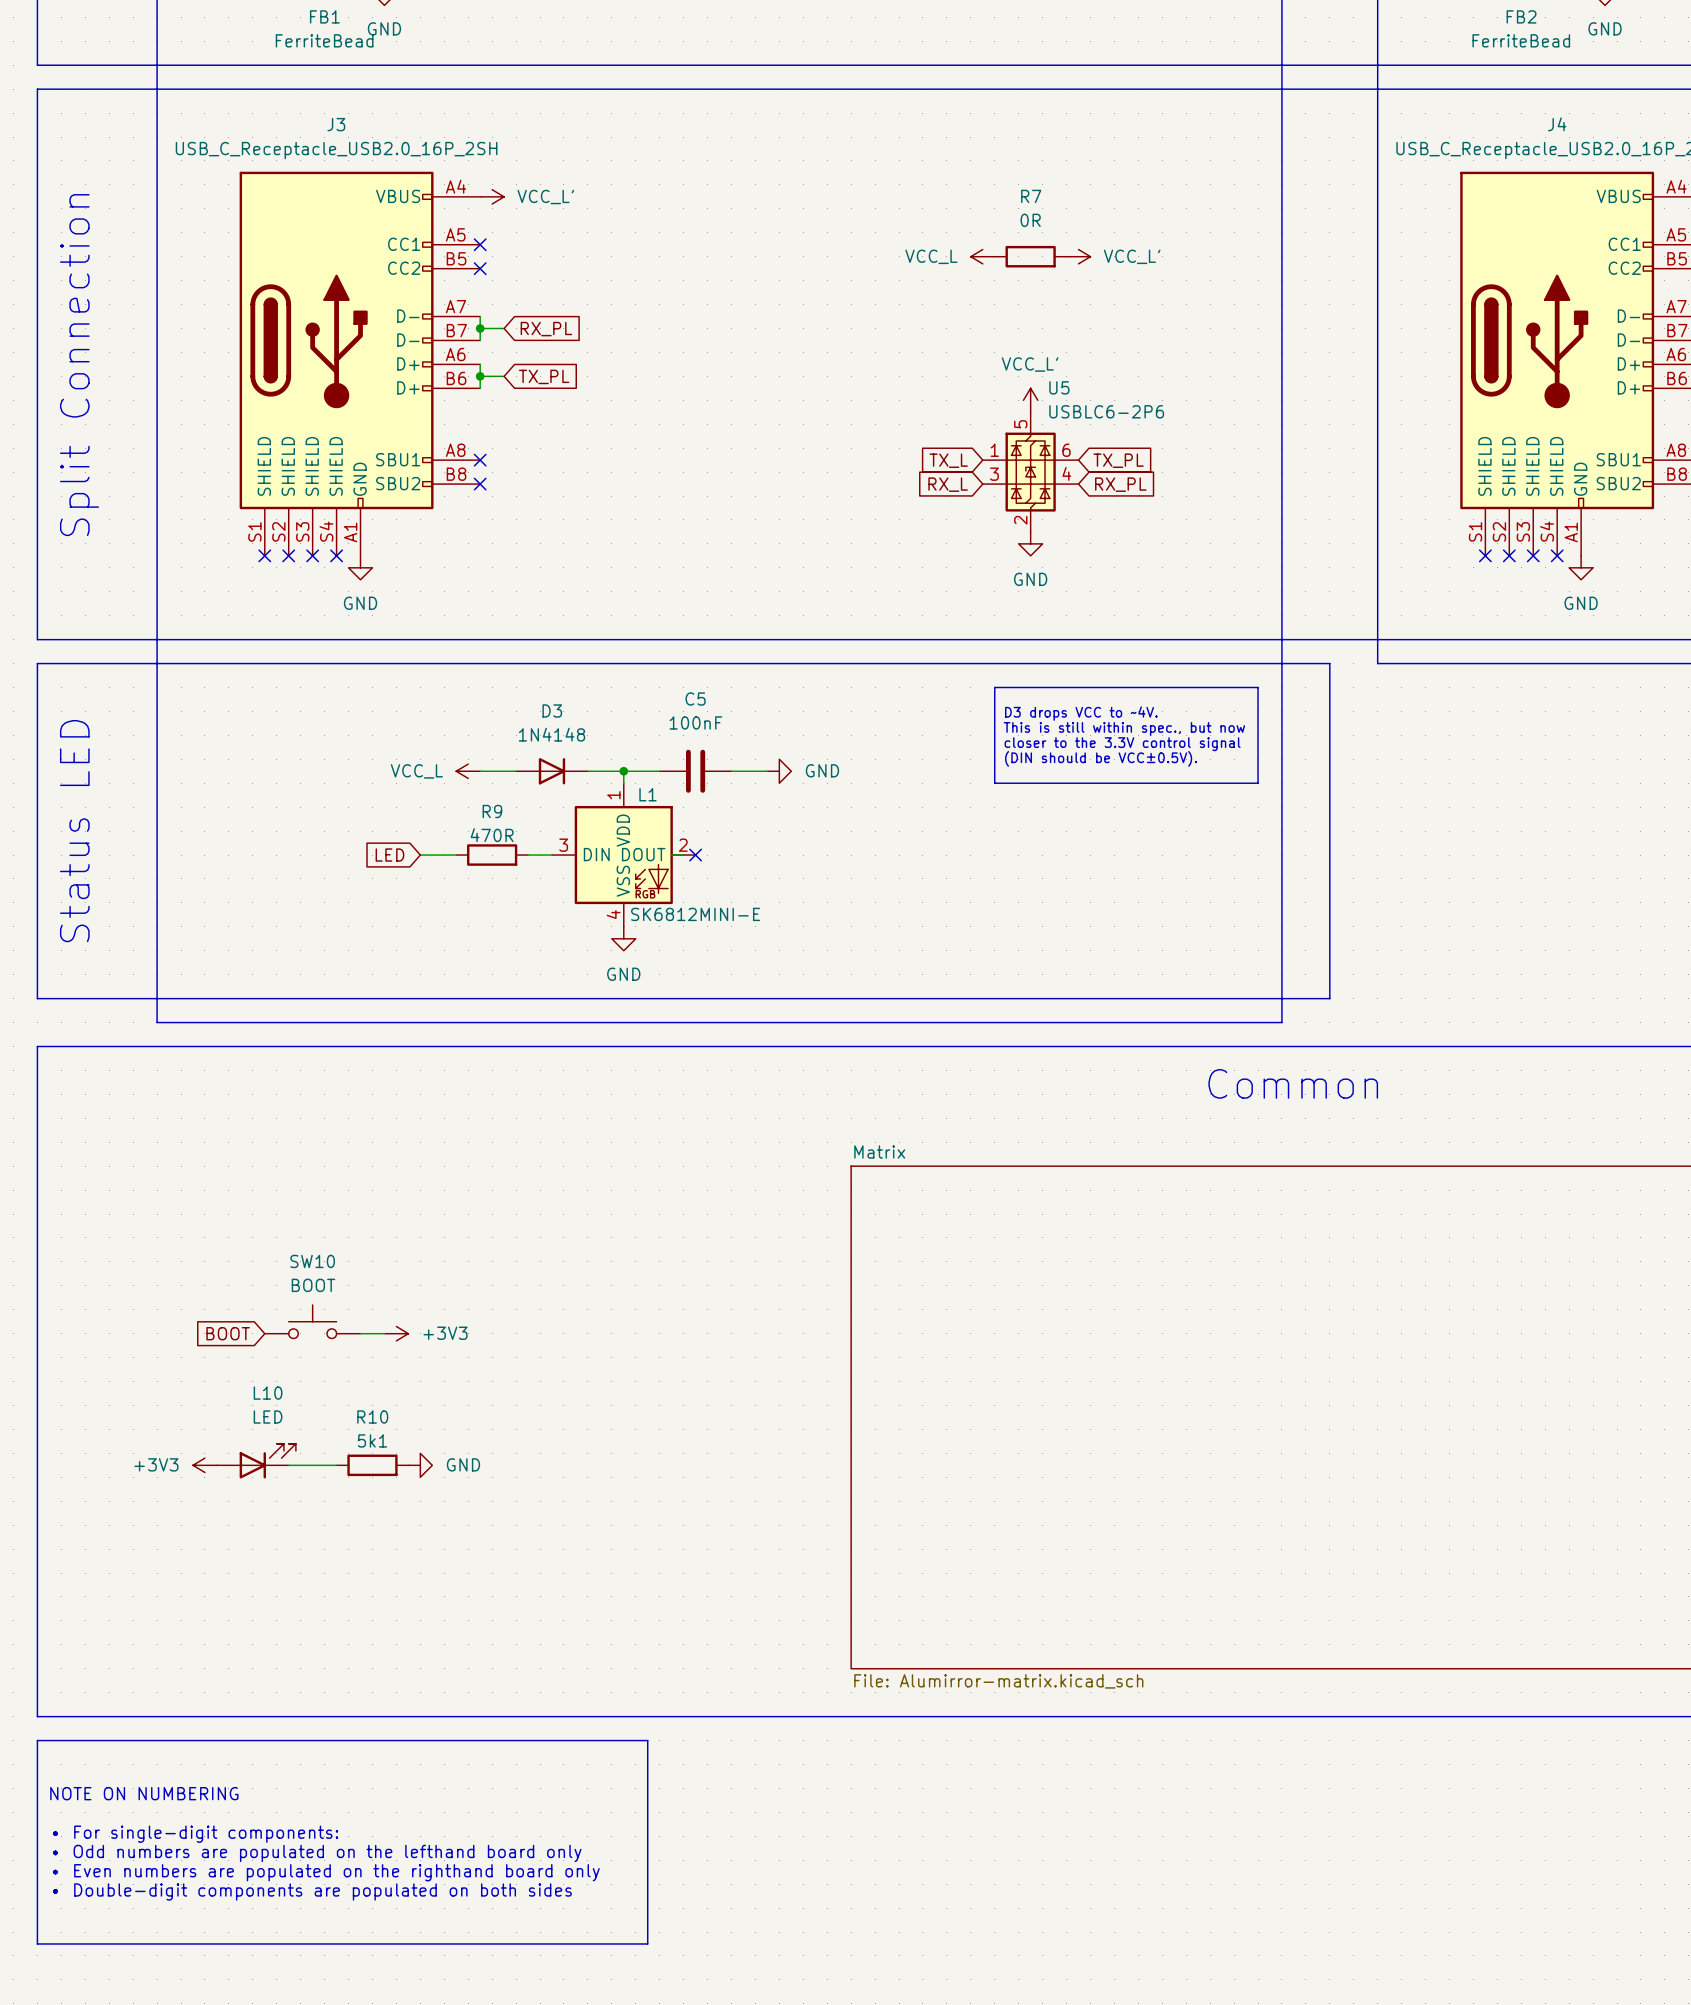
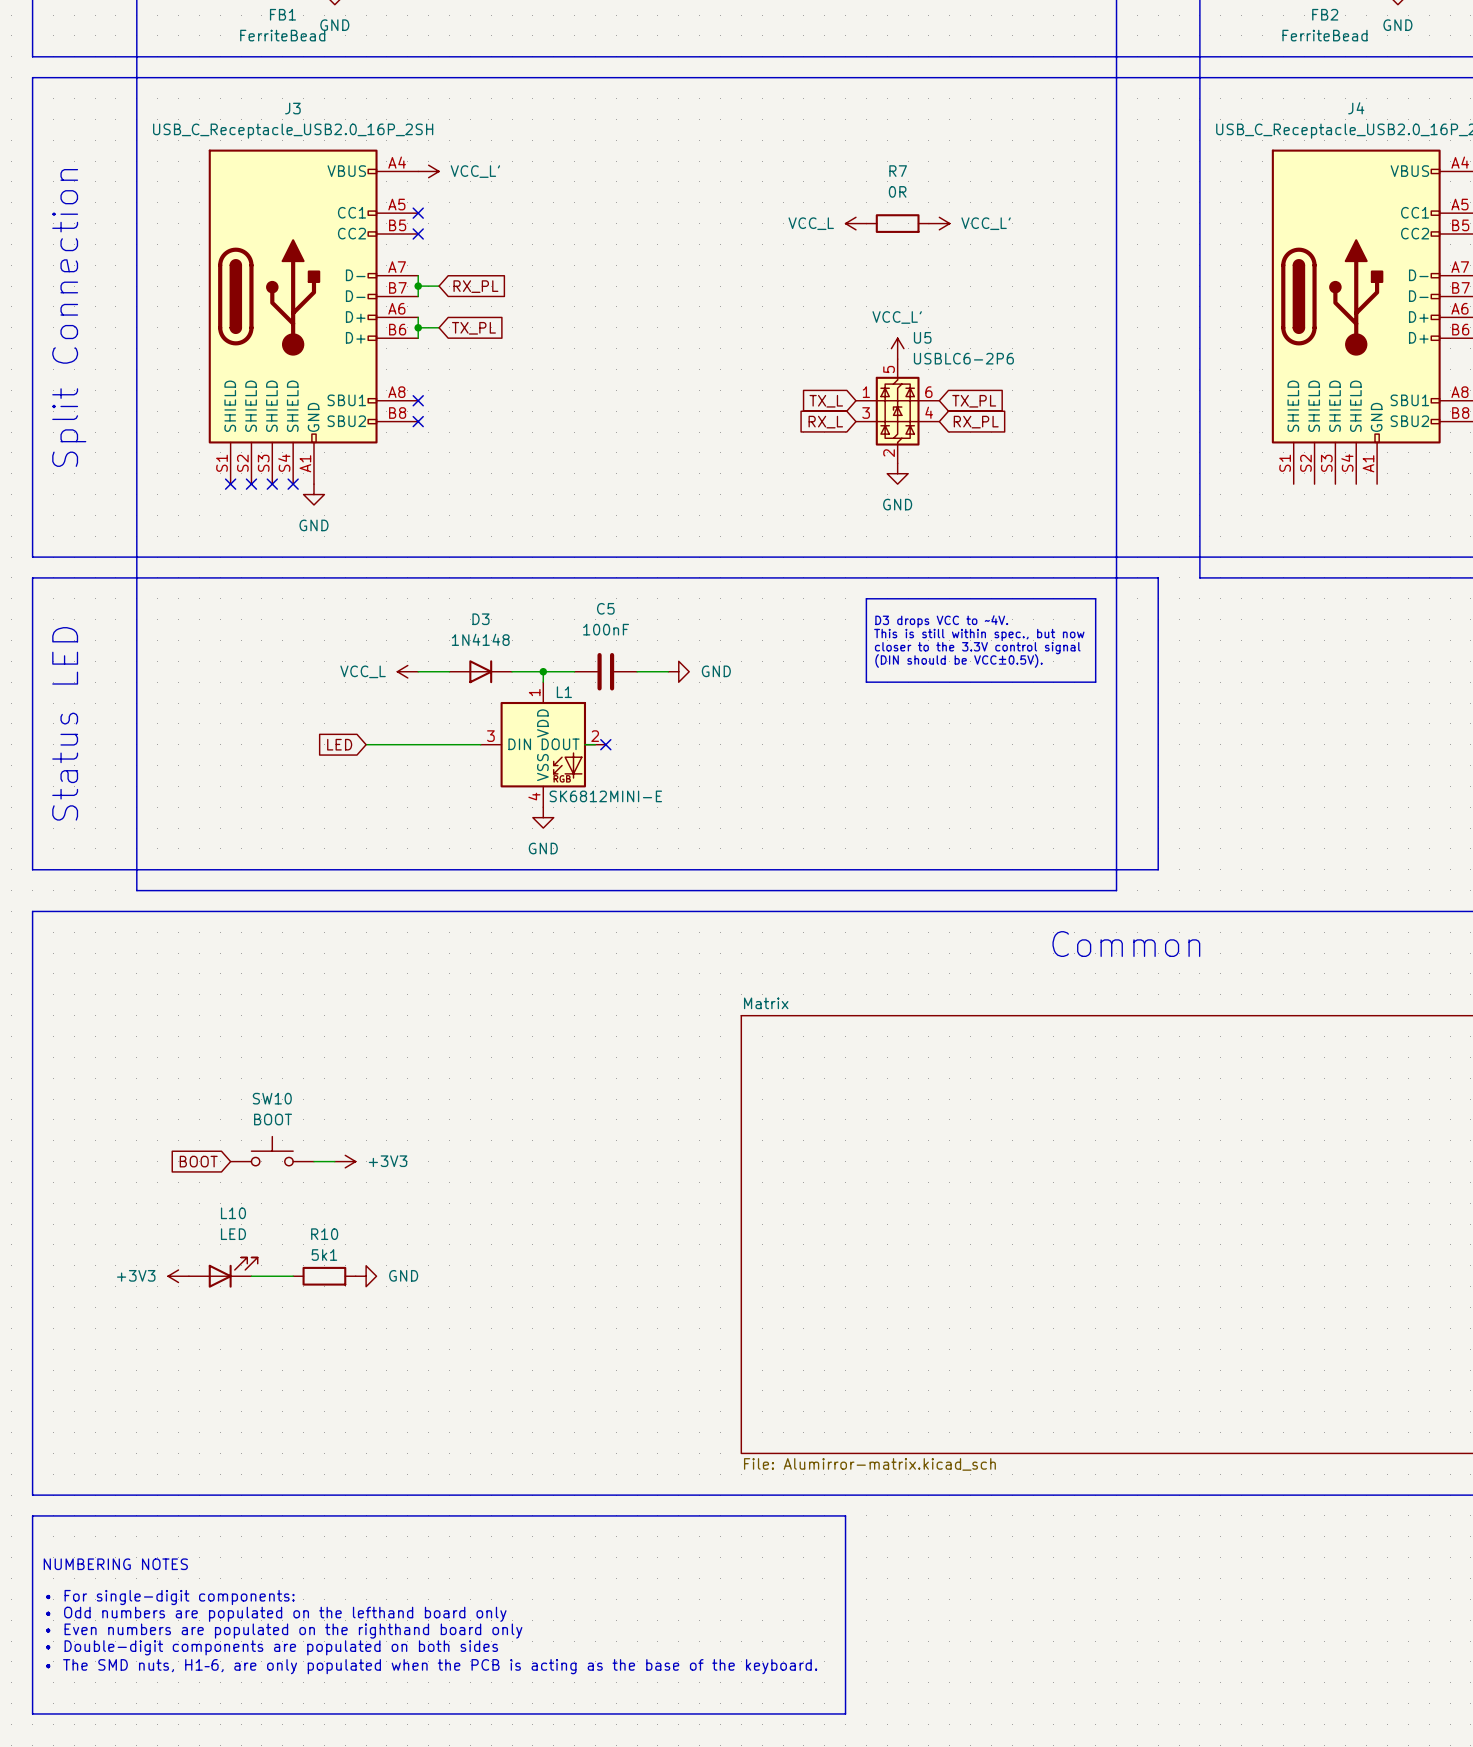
no-connect mark: (1485, 555) -> none
no-connect mark: (1509, 555) -> none
no-connect mark: (1533, 555) -> none
no-connect mark: (1557, 555) -> none
power symbol: GND (1581, 567) -> none
wire: none -> (397, 744) (459, 744)
R9: 470R (492, 855) -> none
line: (647, 1740) (647, 1943) (37, 1943) -> (564, 1515) (845, 1515) (845, 1713) (32, 1713) (32, 1693)
text: NOTE ON NUMBERING (144, 1793) -> NUMBERING NOTES (115, 1564)
text: none -> • The SMD nuts, H1–6, are only populated when the PCB is acting as the base of the keyboard. (431, 1666)

